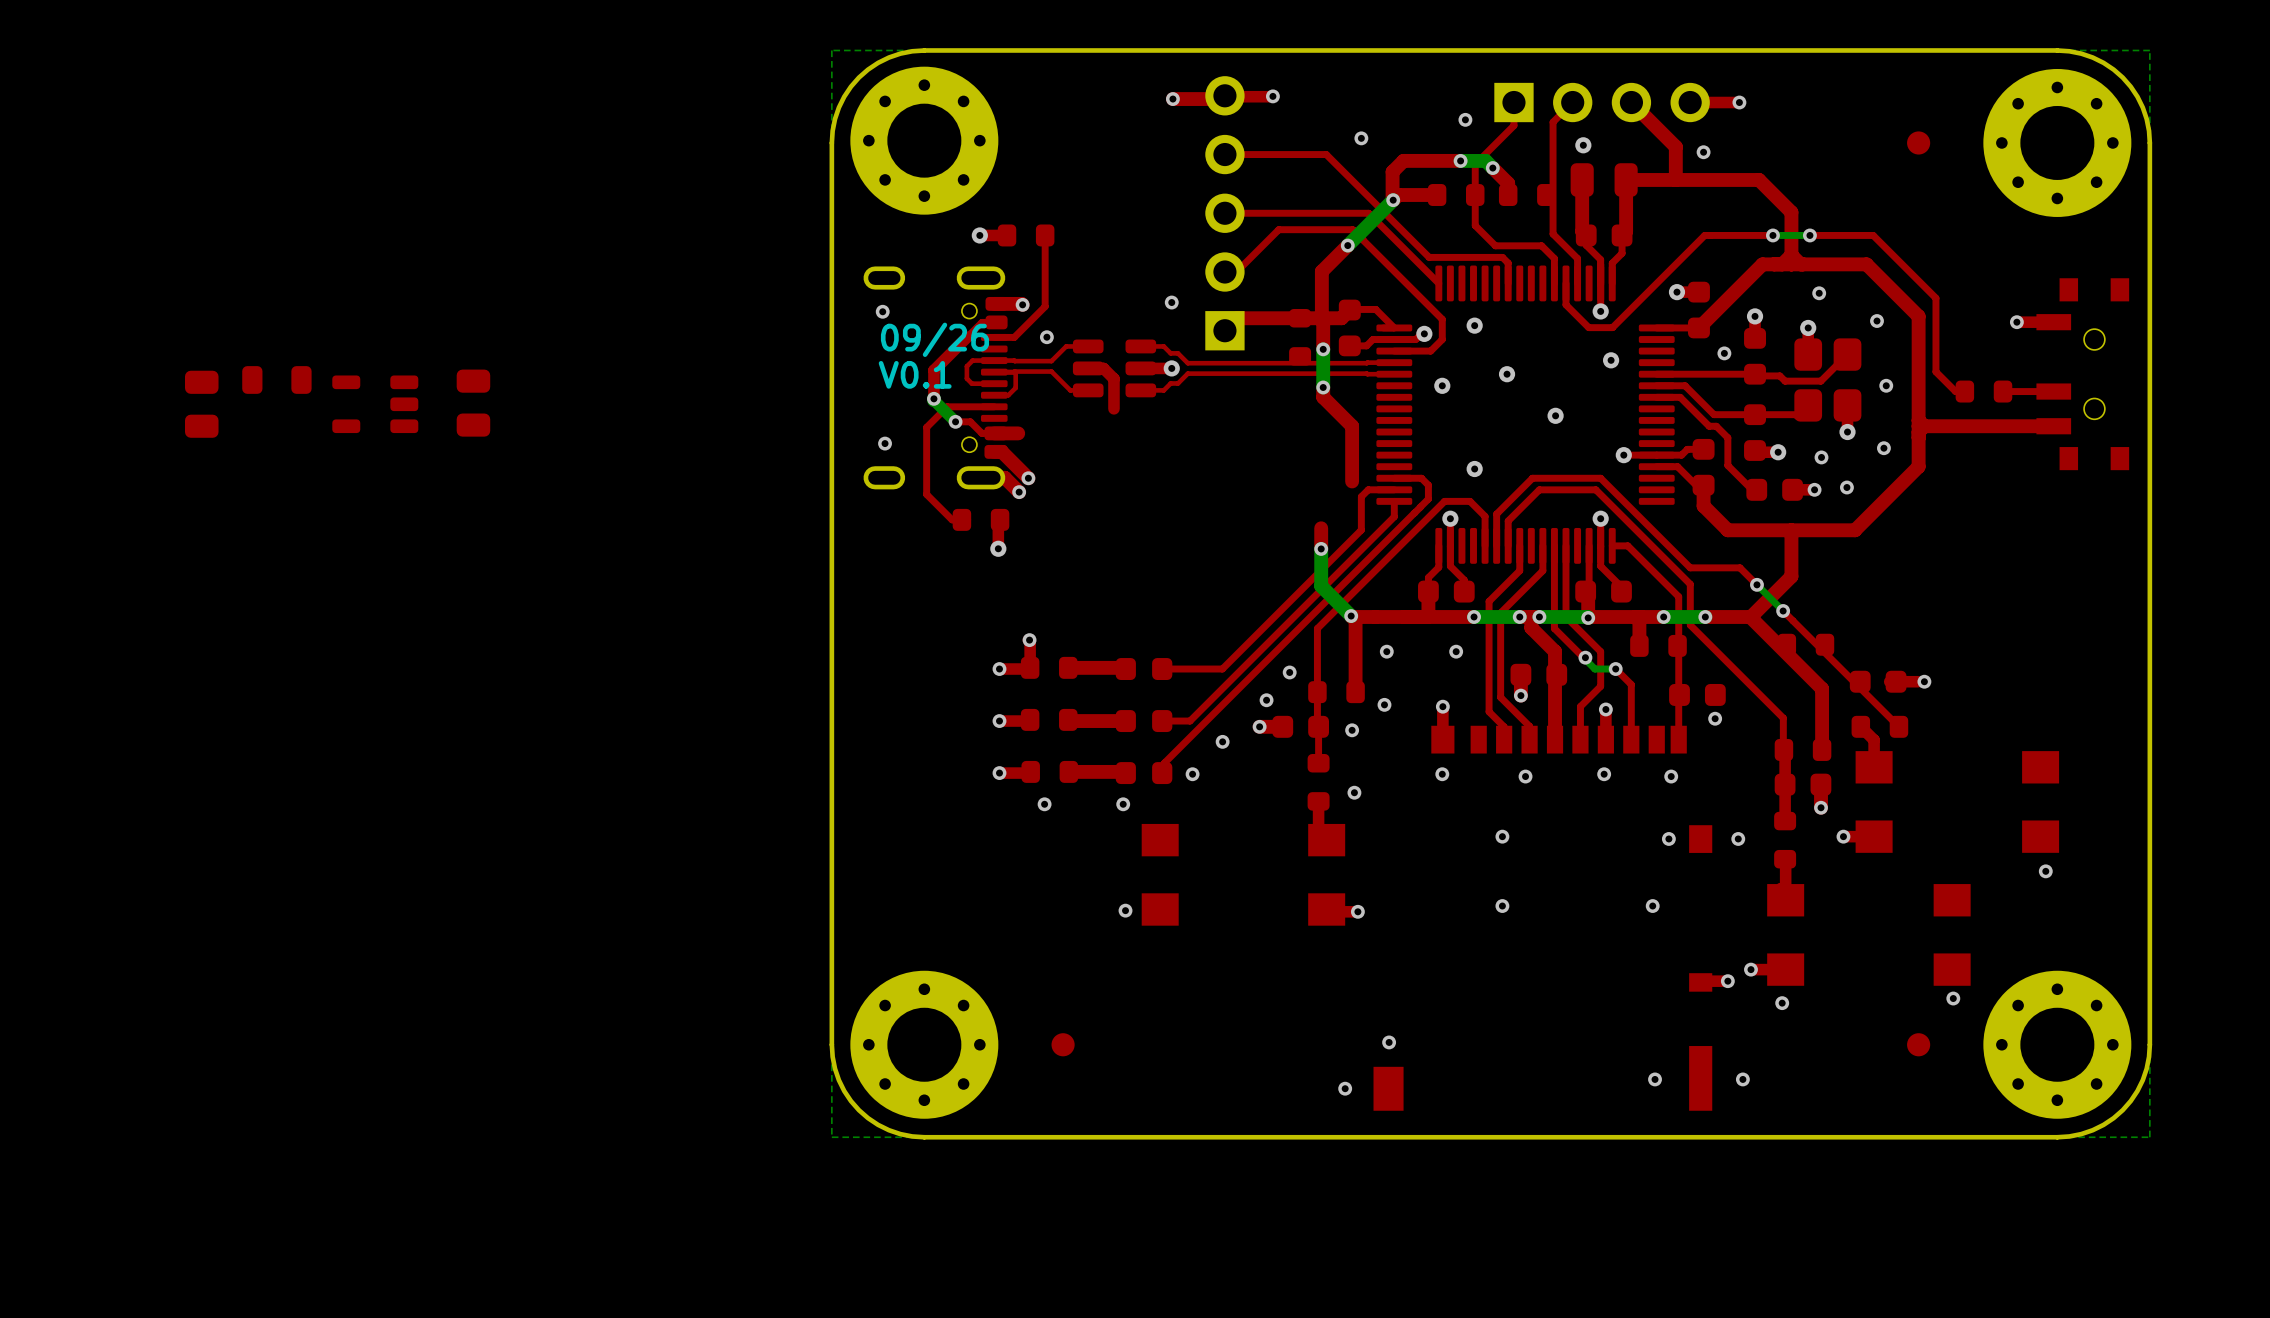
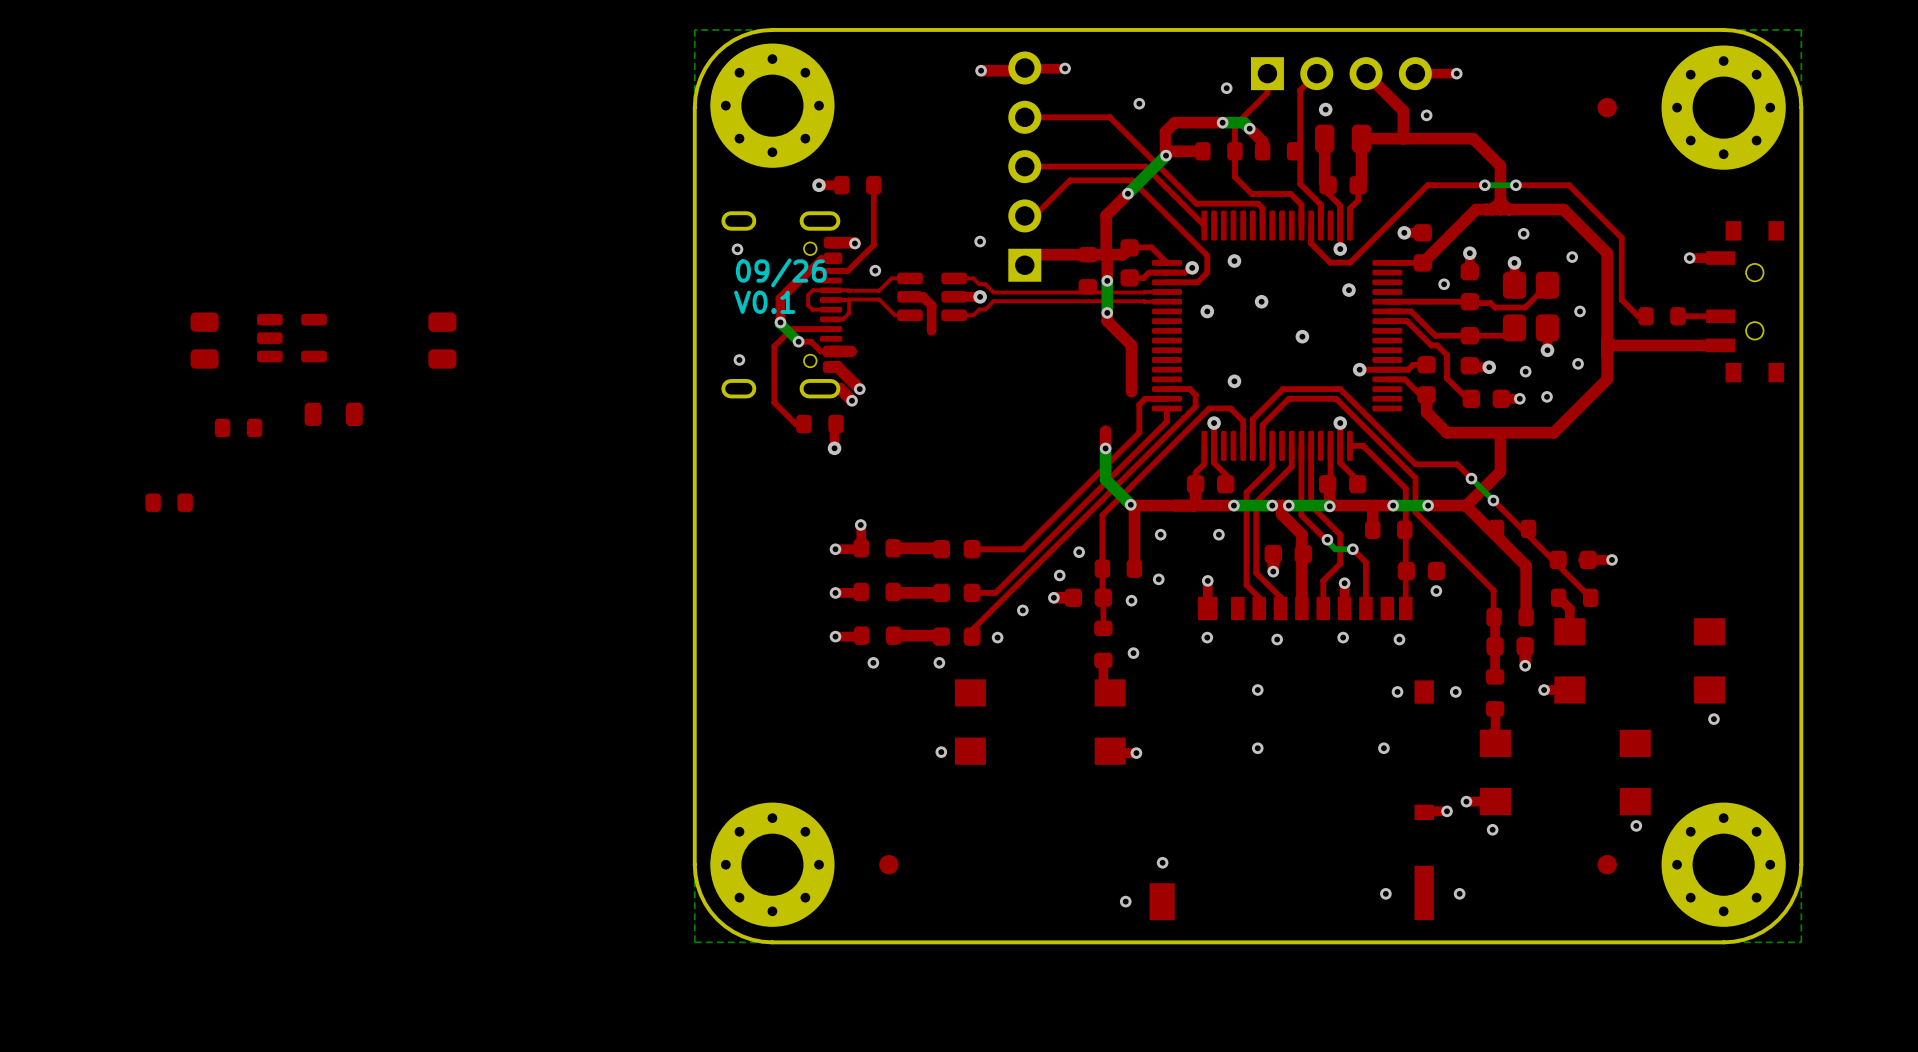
part position: (276, 379) -> (333, 414)
part position: (473, 403) -> (442, 340)
part position: (201, 404) -> (204, 340)
part: (375, 404) -> none
part: none -> (291, 338)
part: none -> (238, 427)
part: none -> (169, 502)

